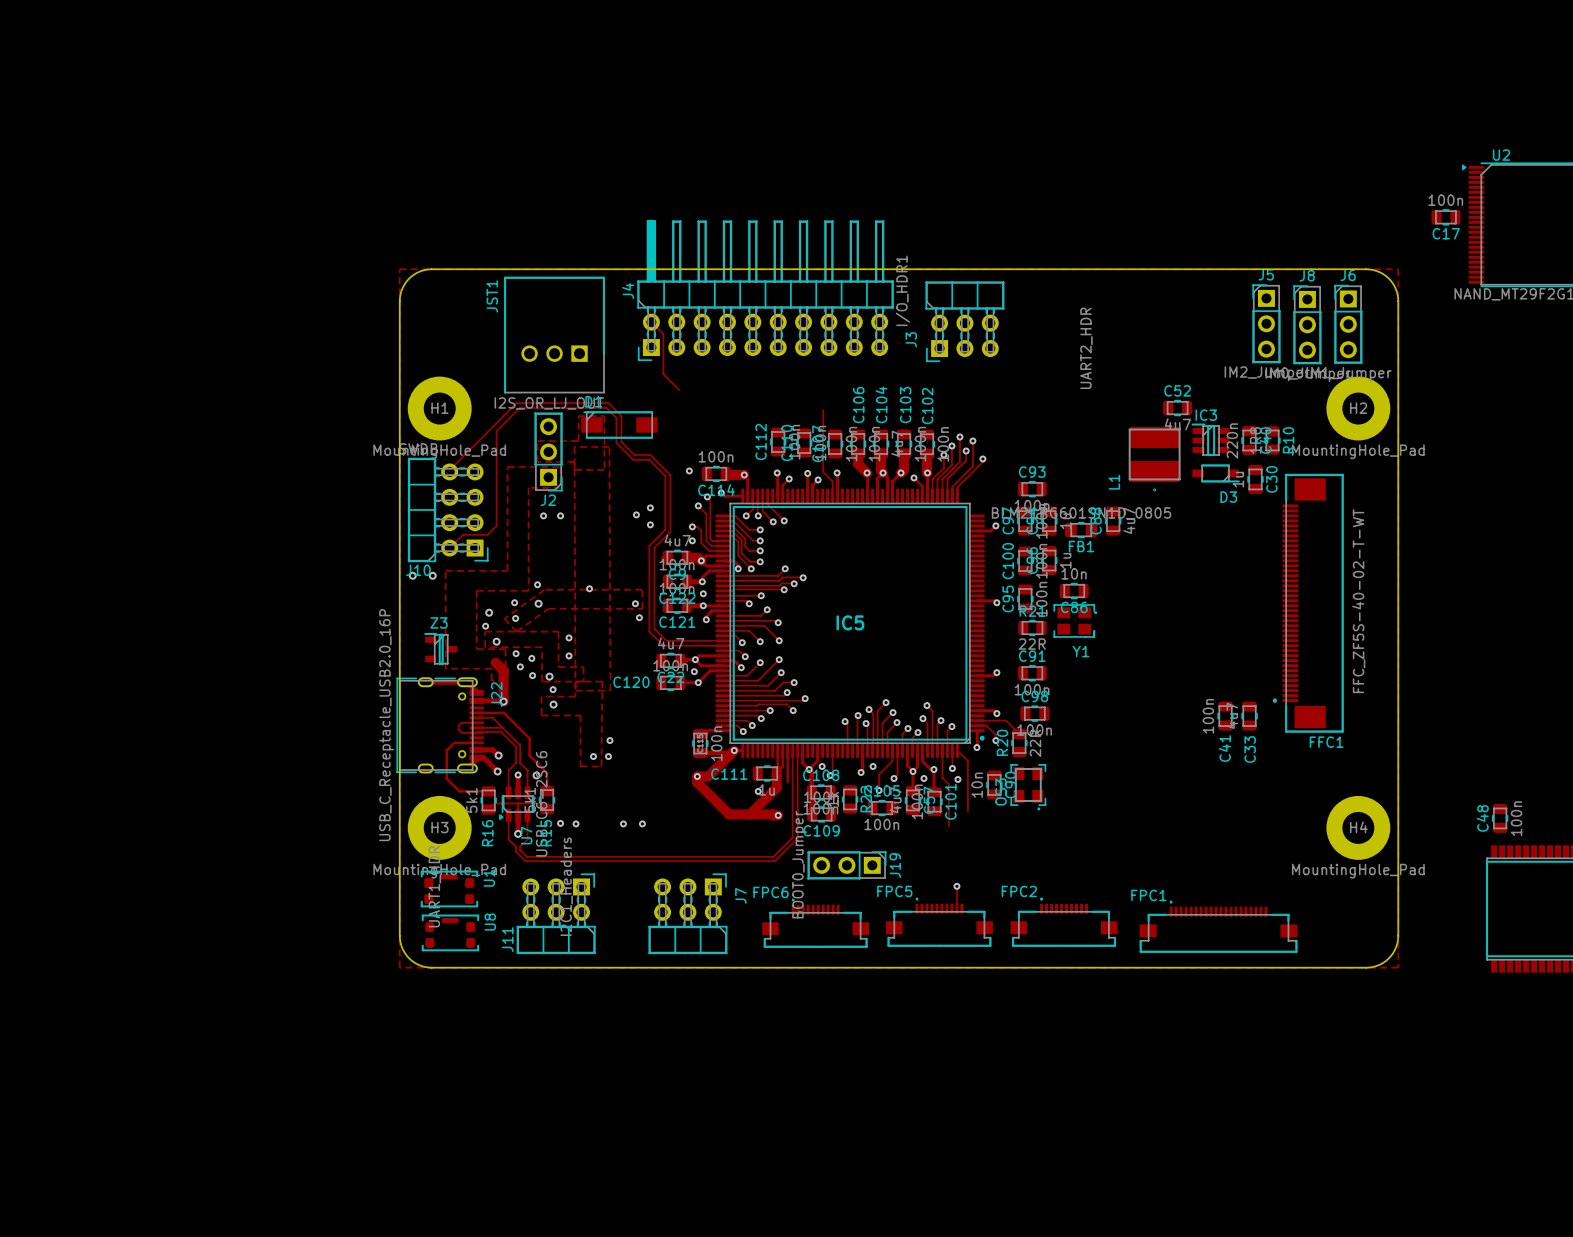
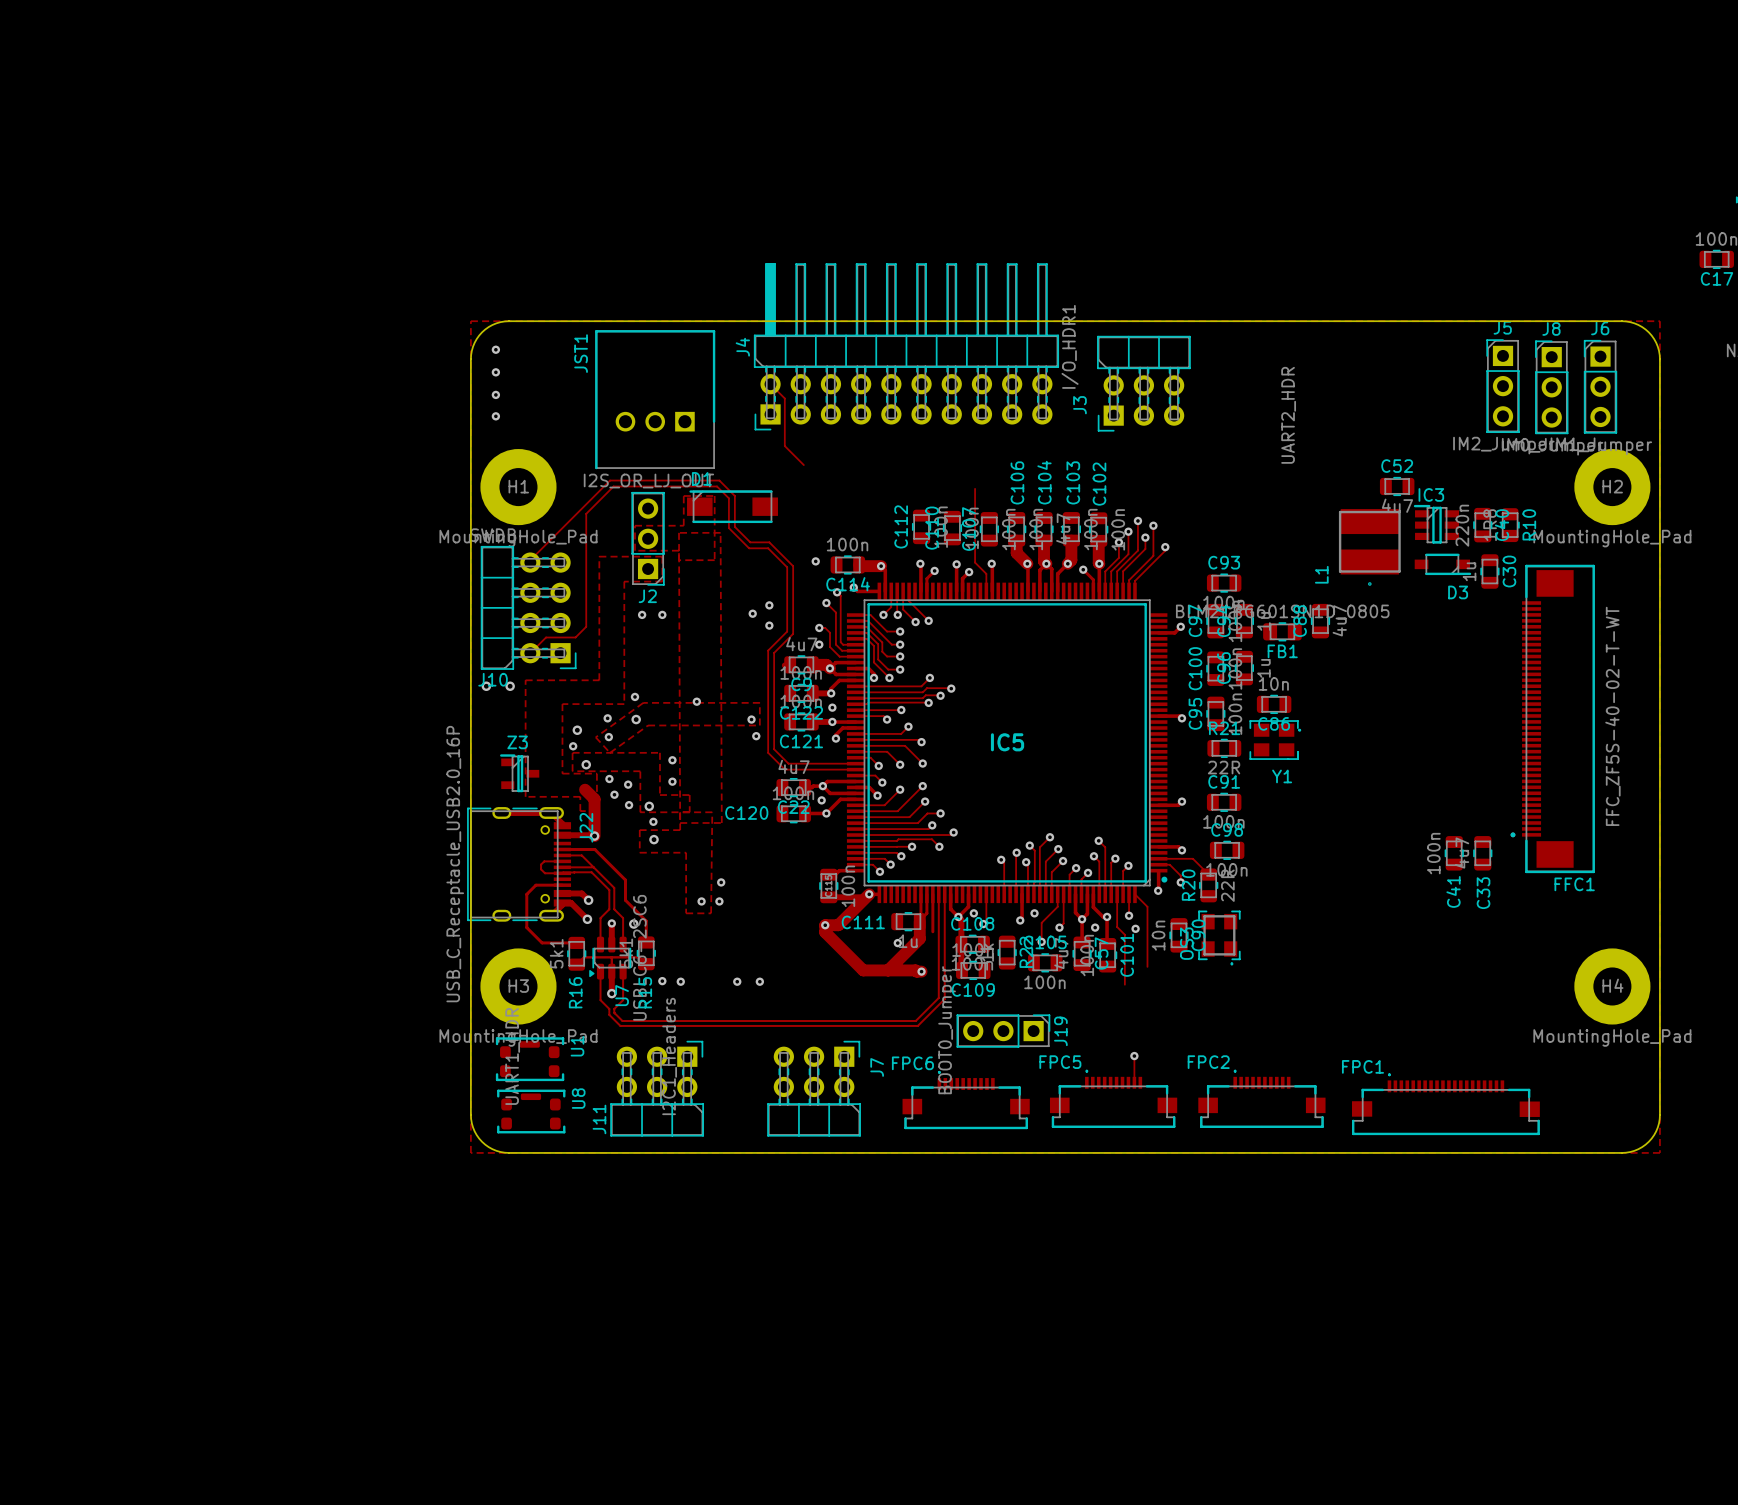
via: none -> (495, 349)
via: none -> (495, 372)
via: none -> (495, 394)
via: none -> (495, 416)

